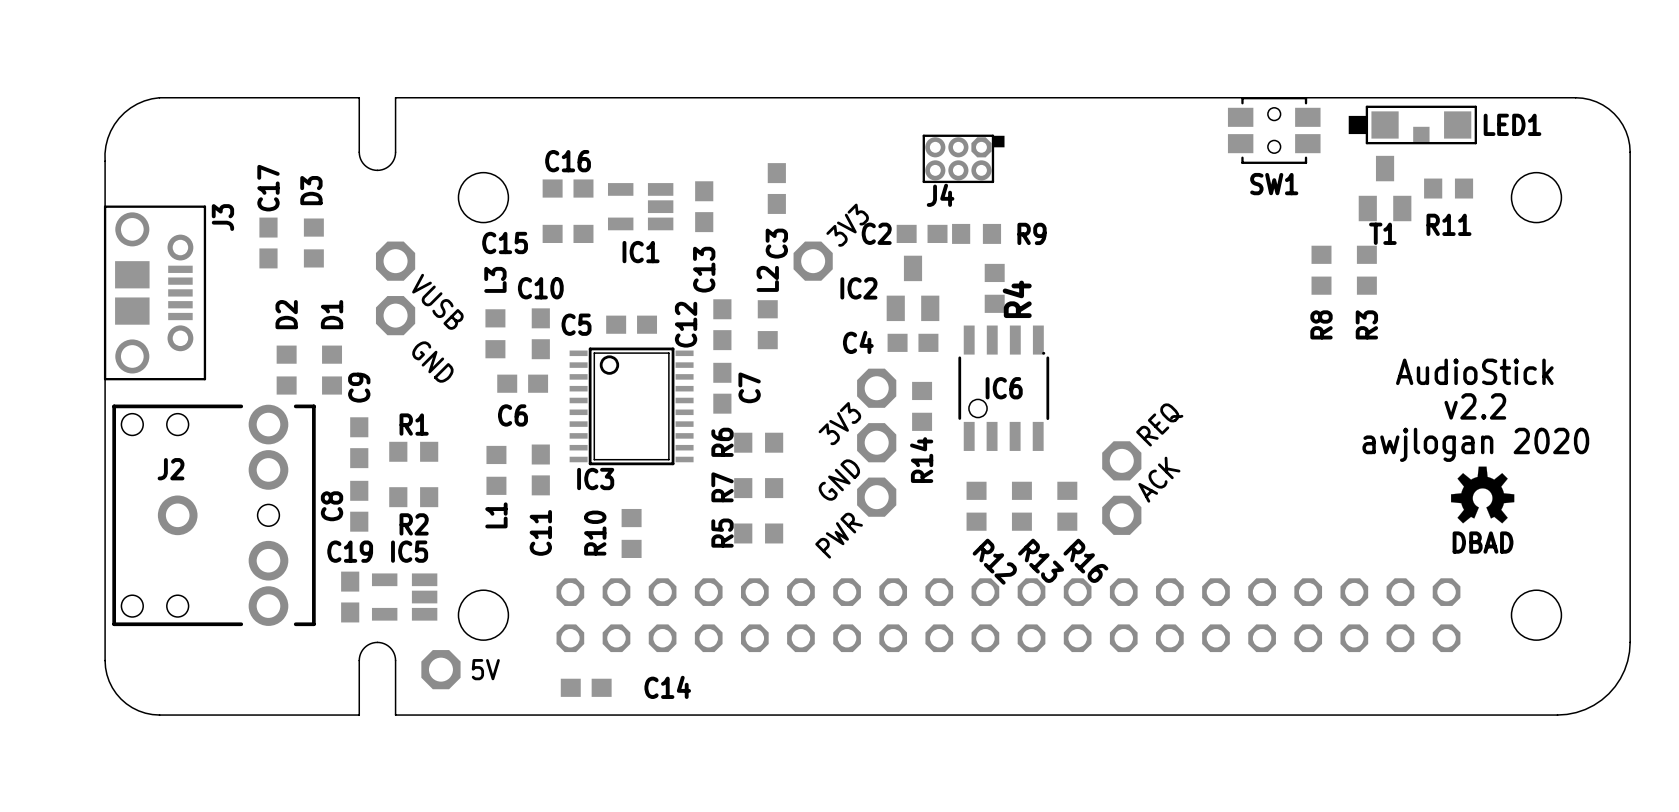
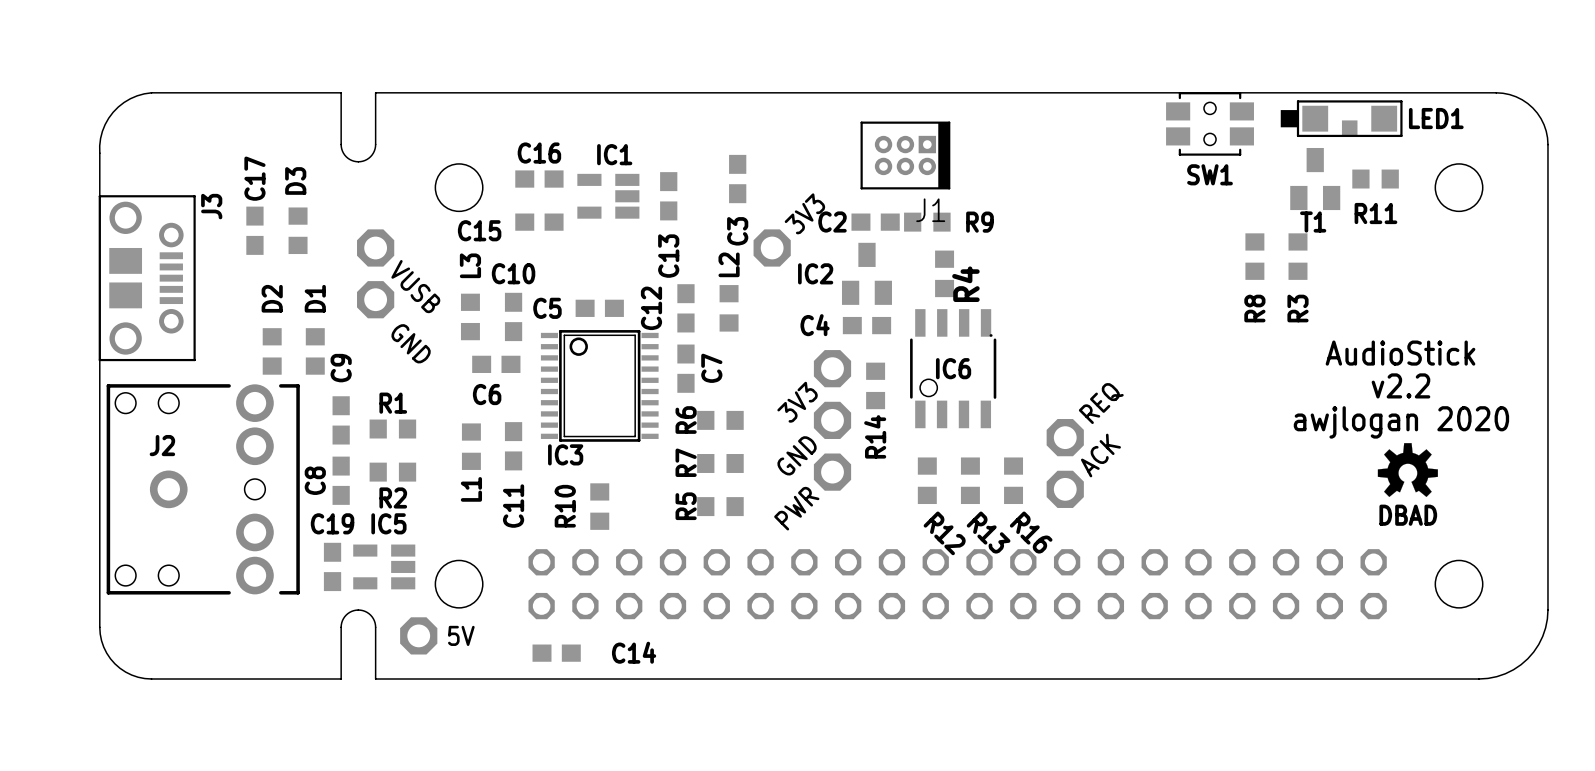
J4: (963, 158) -> none
J1: none -> (905, 155)
IC1 name position: IC1 (641, 252) -> IC1 (614, 154)

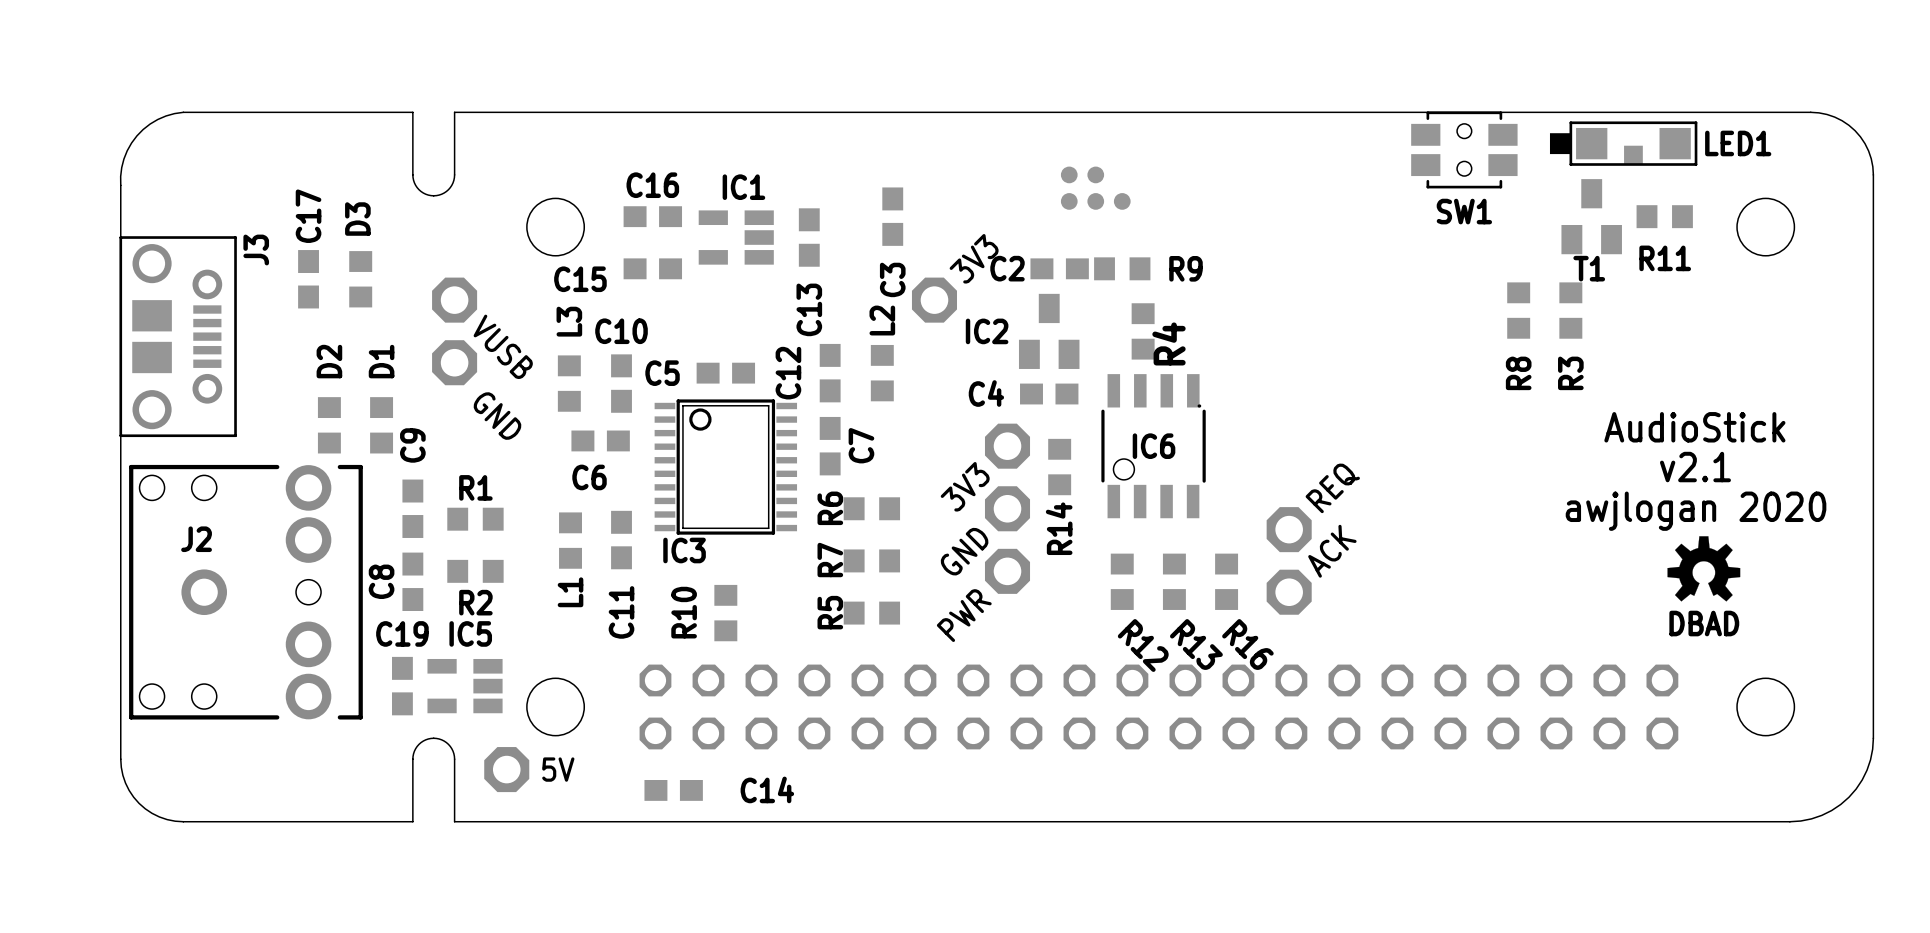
part: none -> (1069, 174)
part: none -> (1095, 174)
J1: (905, 155) -> none
part: none -> (1069, 201)
part: none -> (1095, 201)
part: none -> (1122, 201)
text: v2.2 (1400, 385) -> v2.1 (1695, 467)

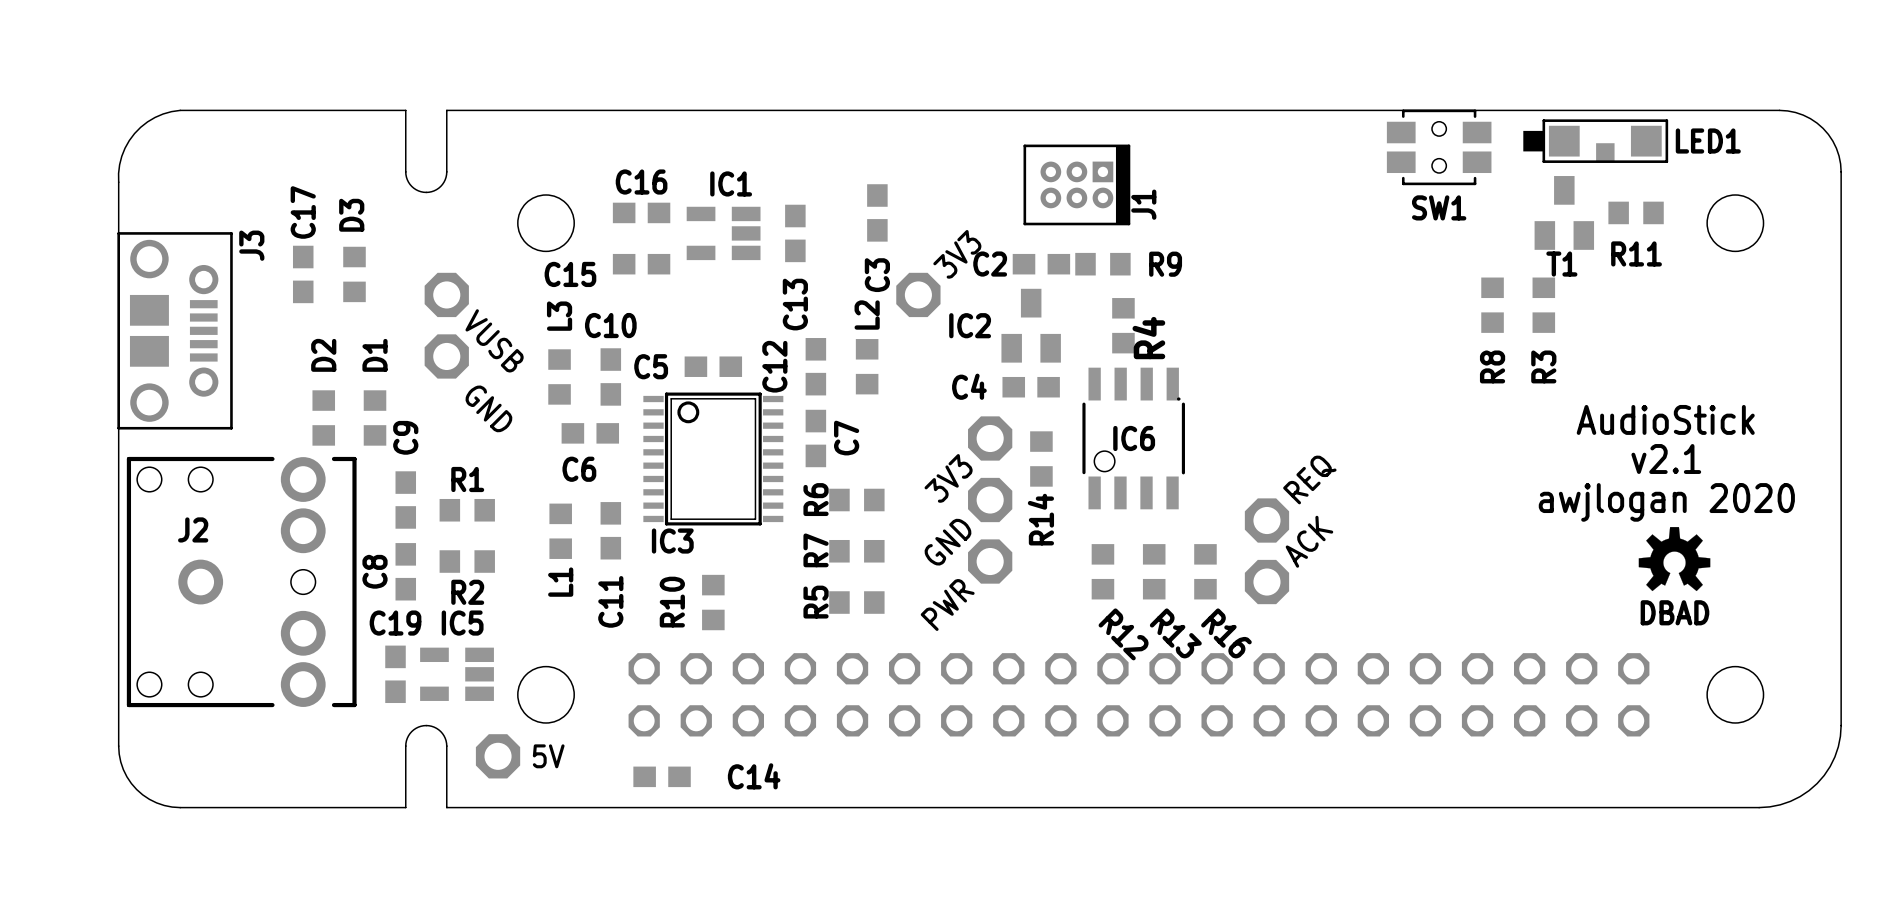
part: (1069, 174) -> none
part: (1095, 174) -> none
J1: none -> (1076, 184)
part: (1069, 201) -> none
part: (1095, 201) -> none
part: (1122, 201) -> none

